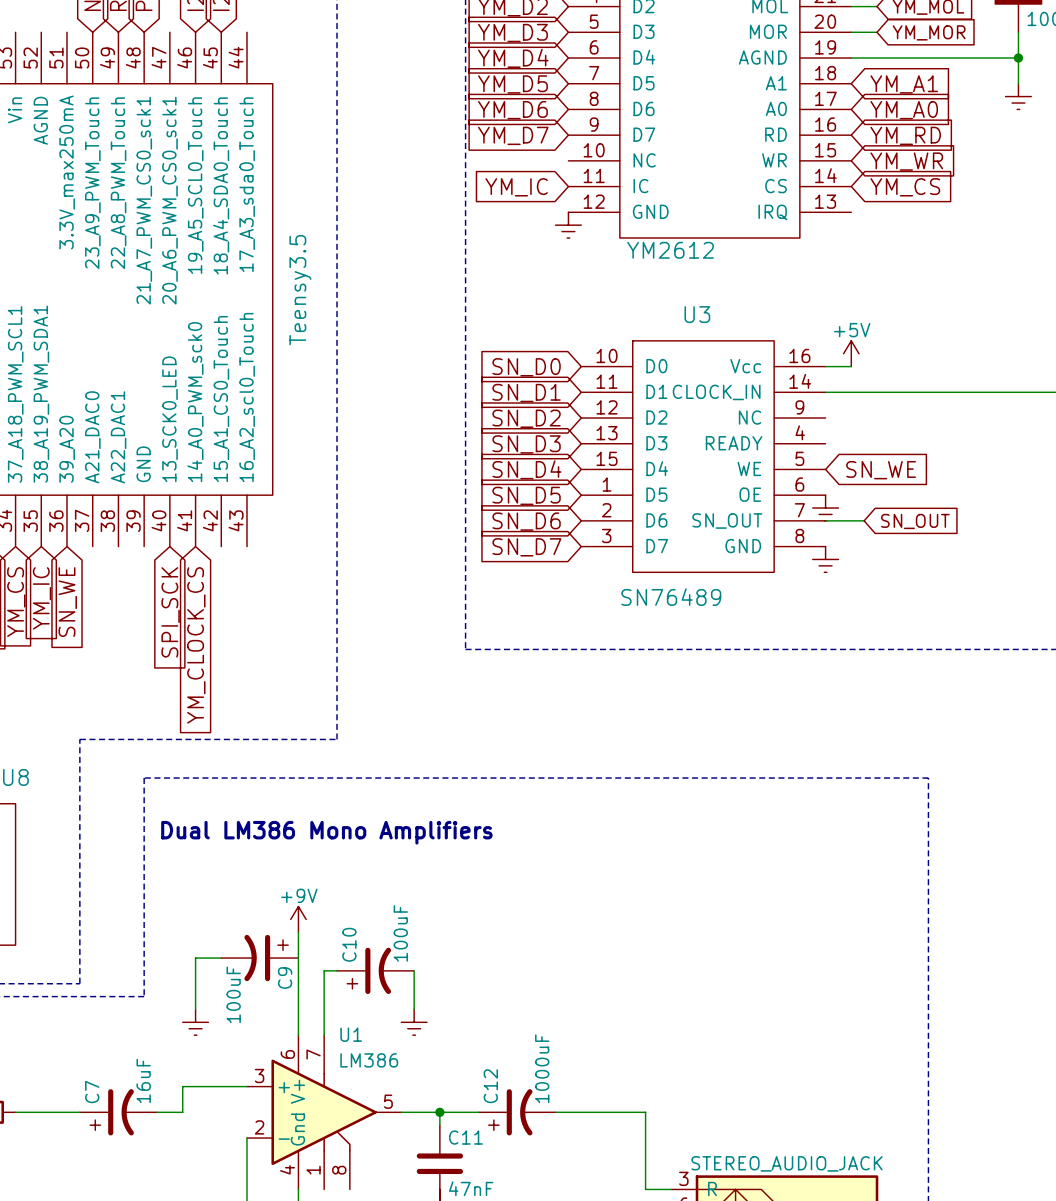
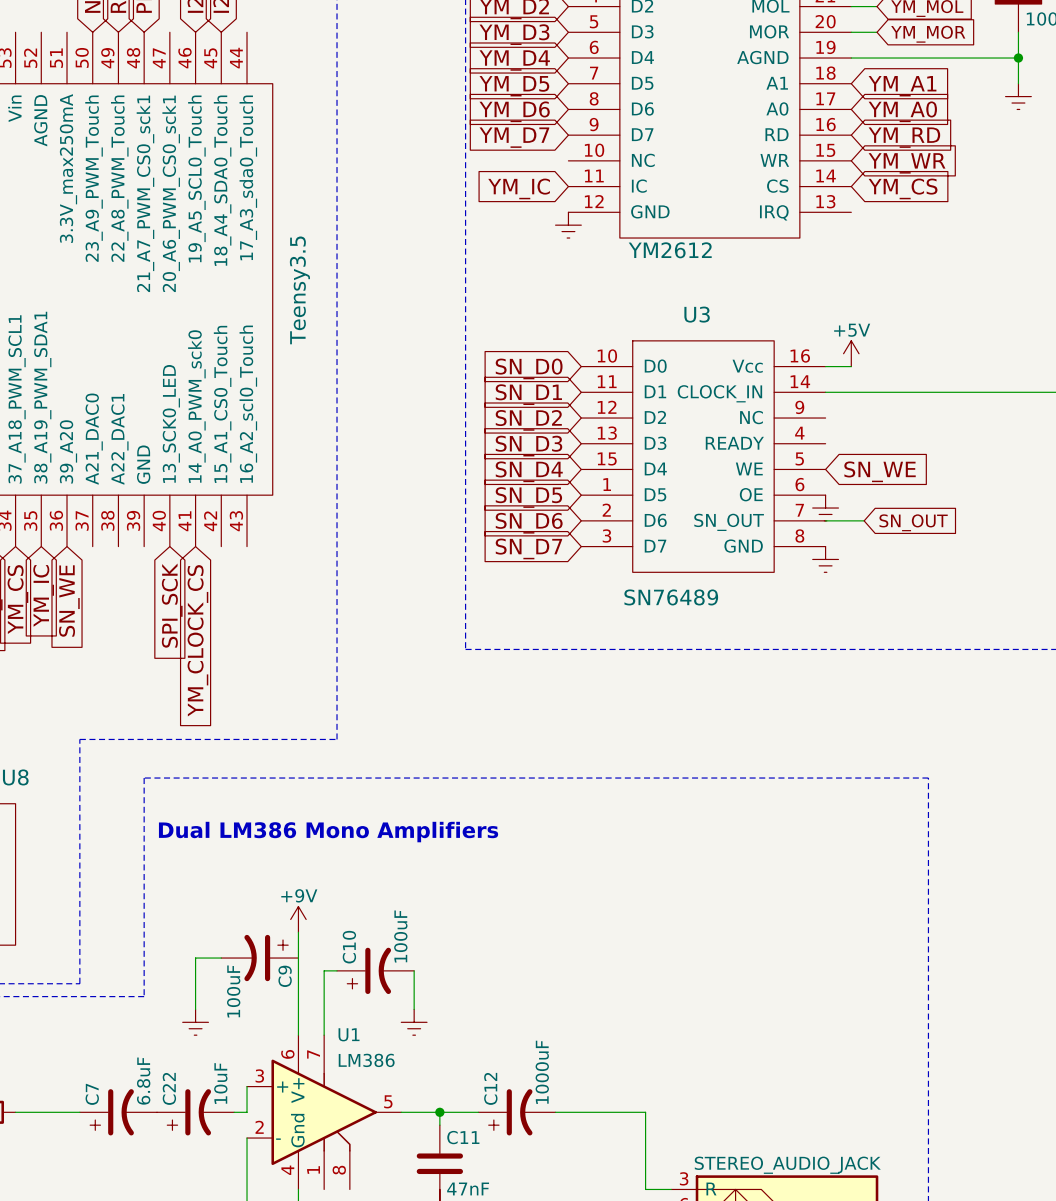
C7 value: 16uF (143, 1080) -> 6.8uF (143, 1081)
wire: (247, 1086) (182, 1086) (182, 1112) (157, 1112) -> (247, 1086) (247, 1112) (234, 1112)
C22: none -> 10uF (195, 1112)

